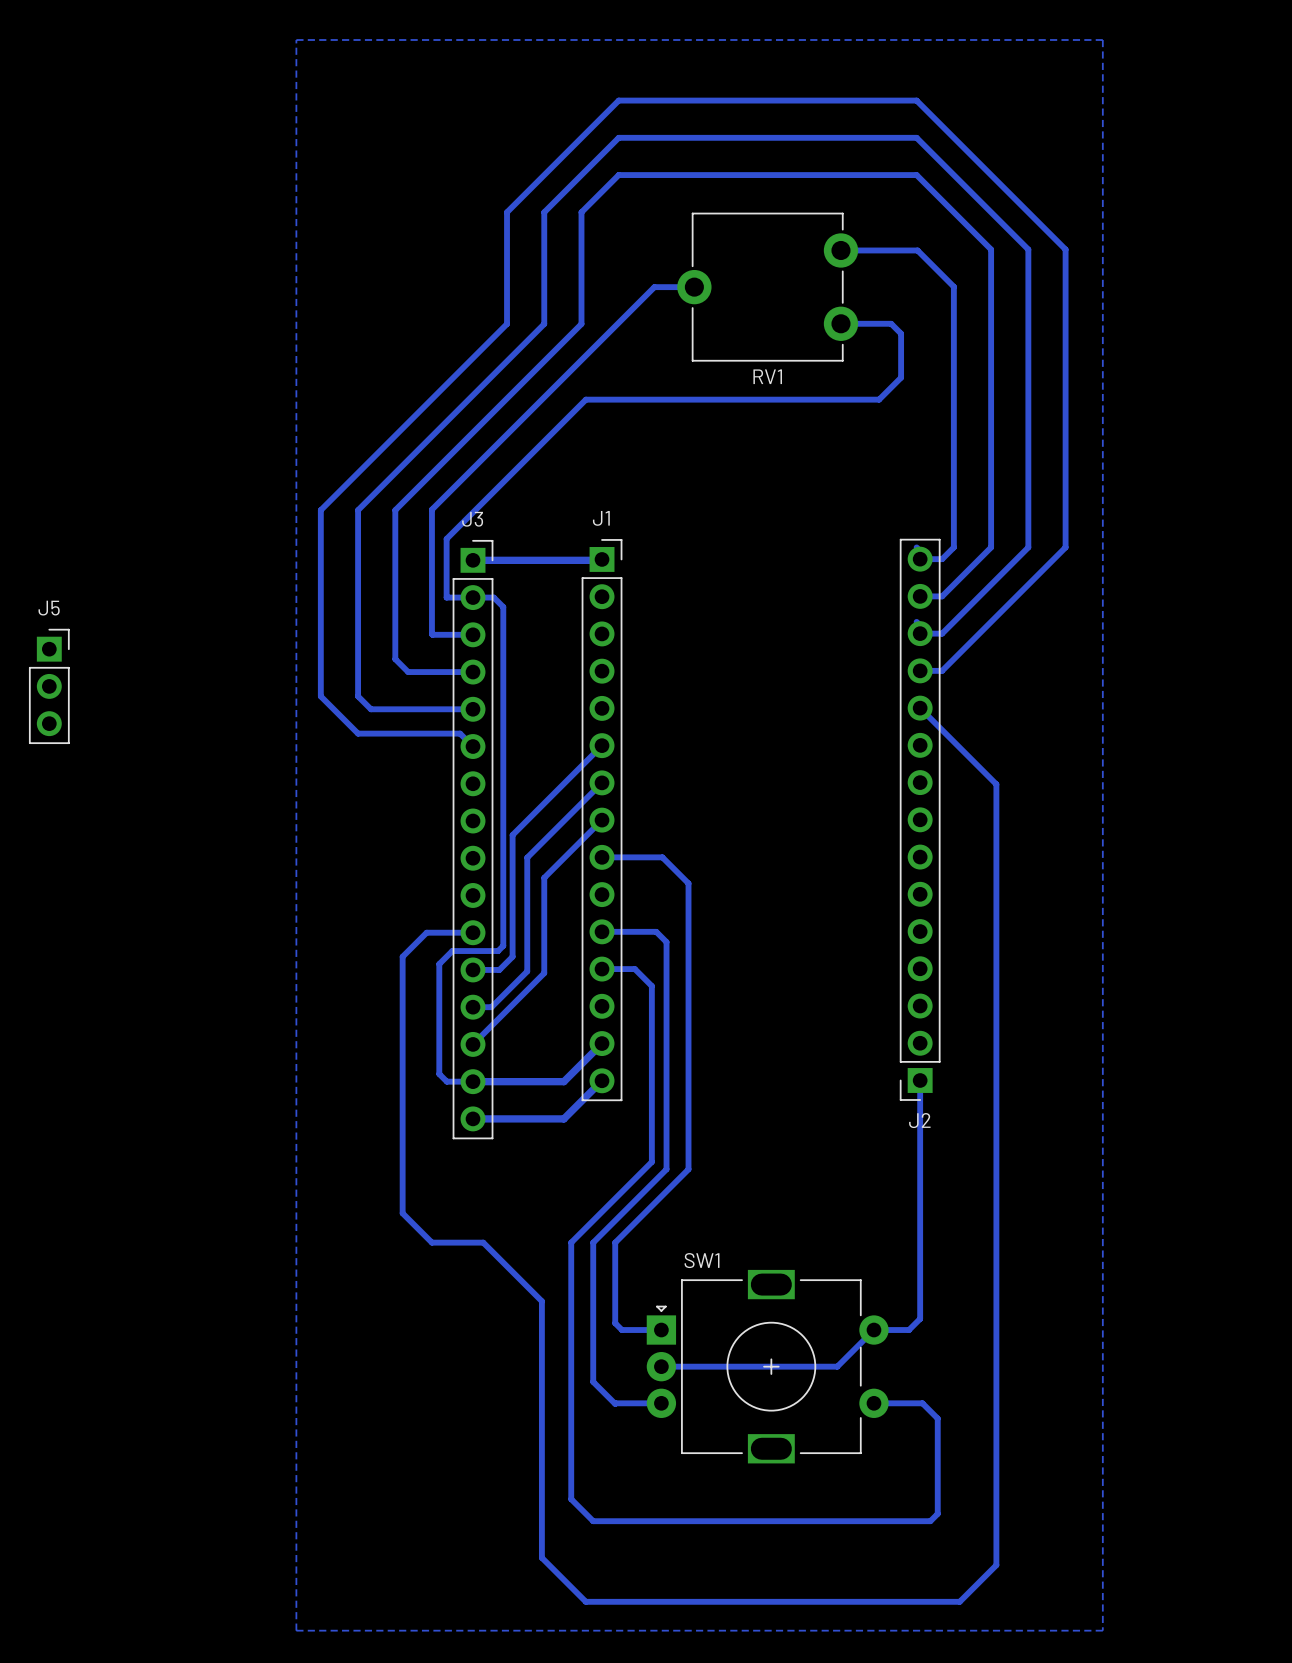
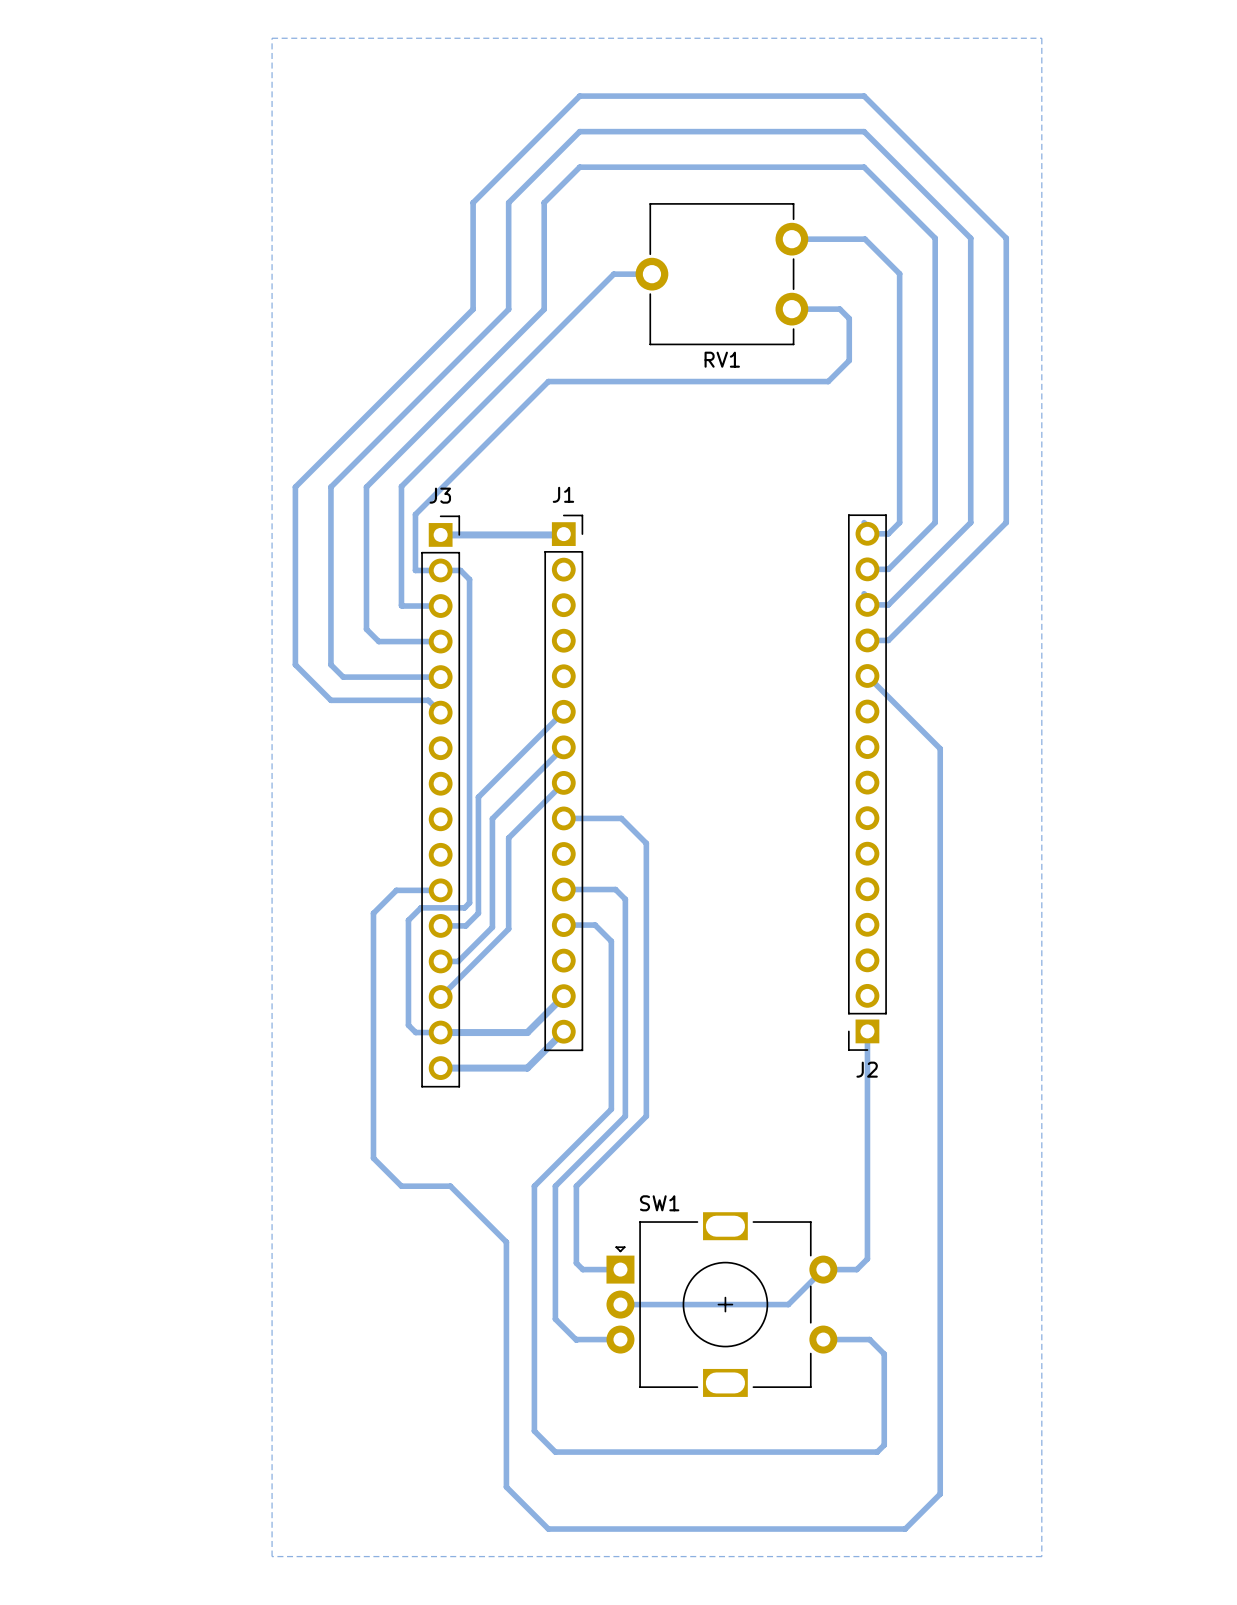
J5: (49, 686) -> none

